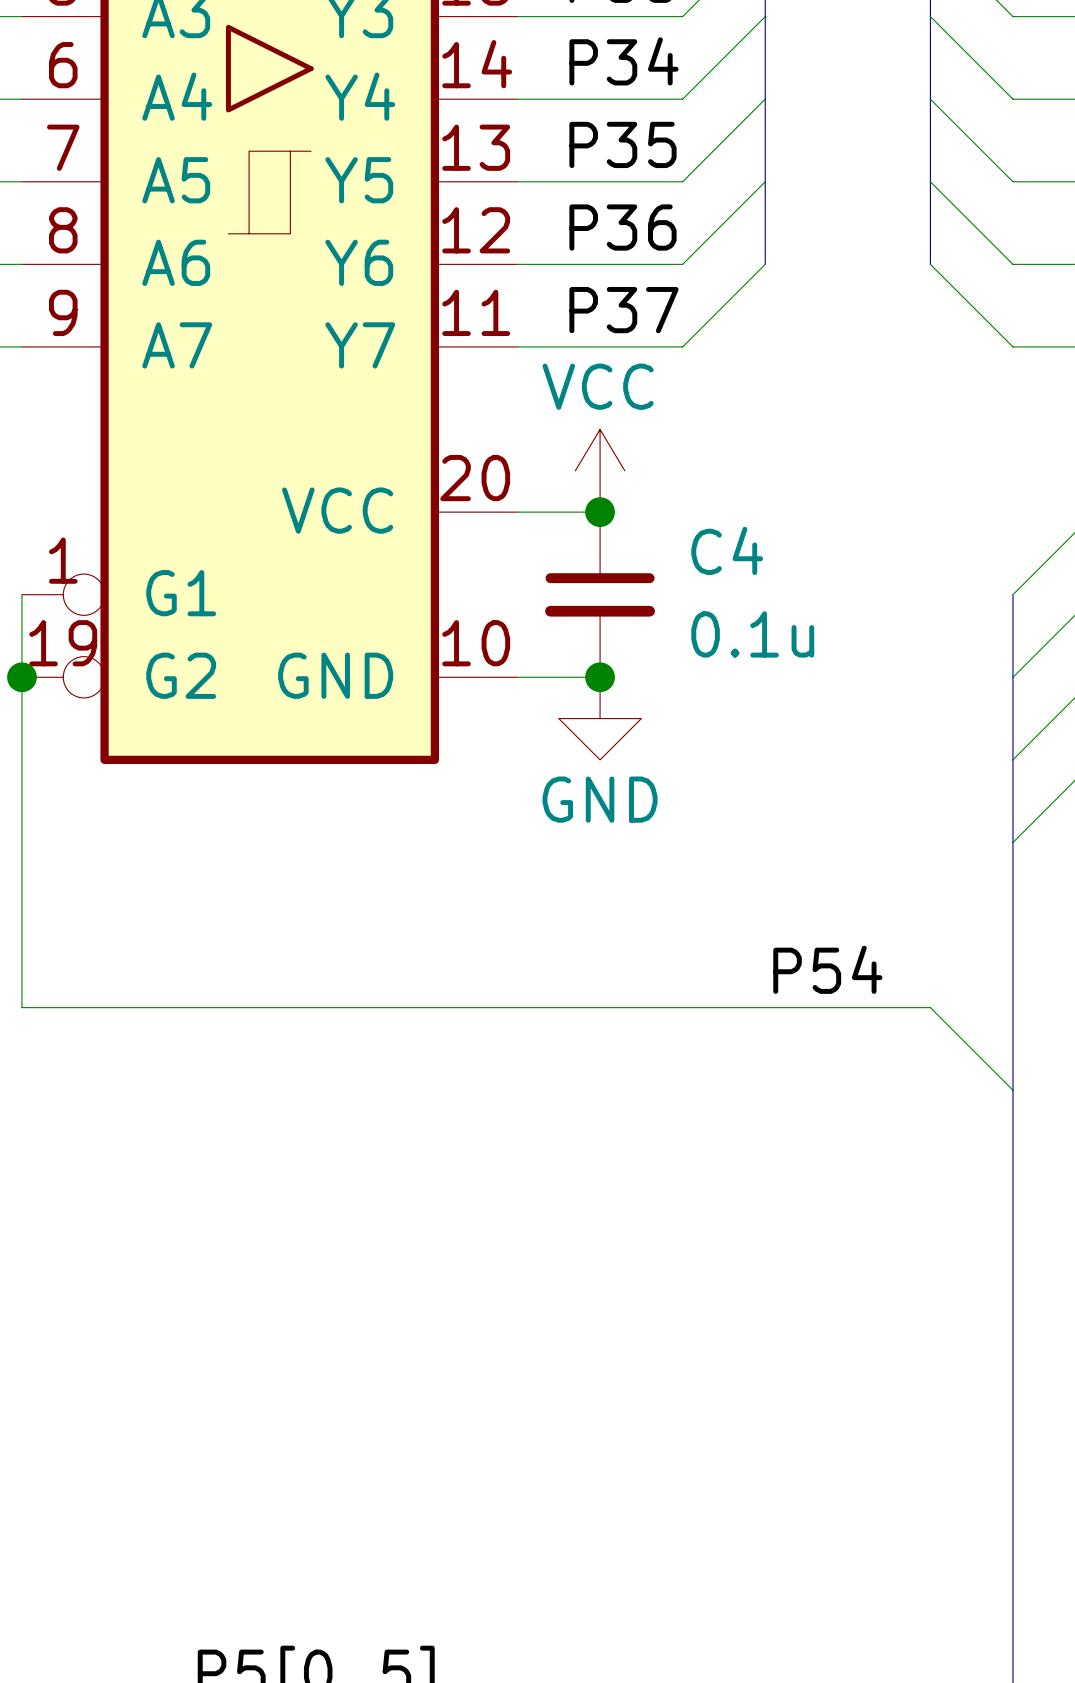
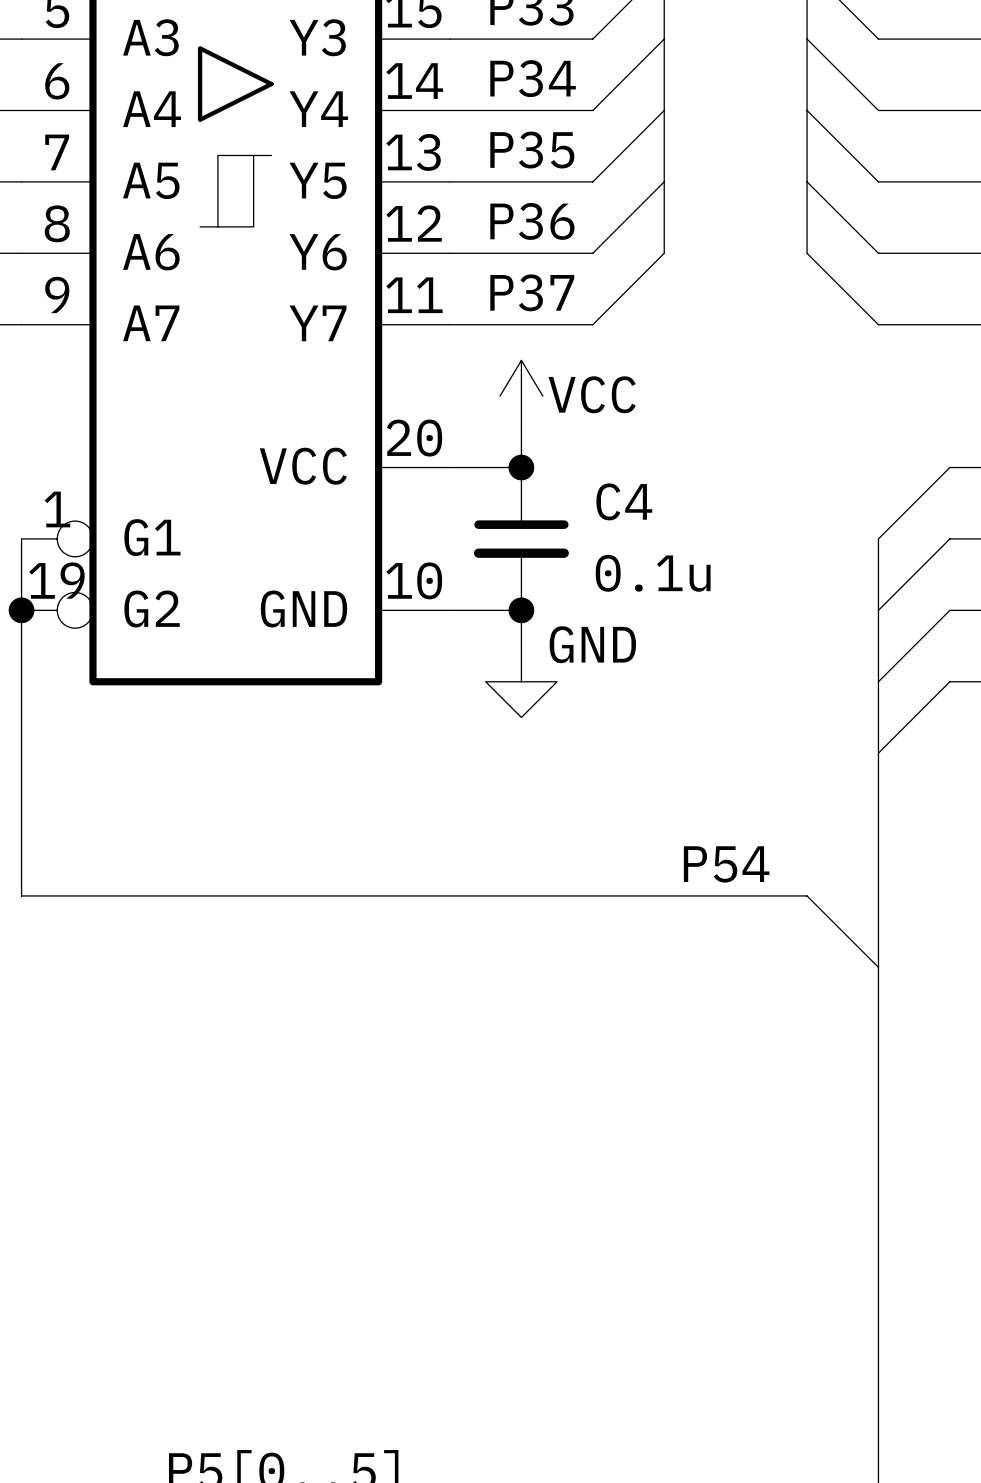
power symbol text position: VCC (598, 386) -> VCC (592, 394)
power symbol position: VCC (600, 470) -> VCC (521, 396)
power symbol position: GND (600, 718) -> GND (521, 681)
power symbol text position: GND (600, 799) -> GND (592, 644)

